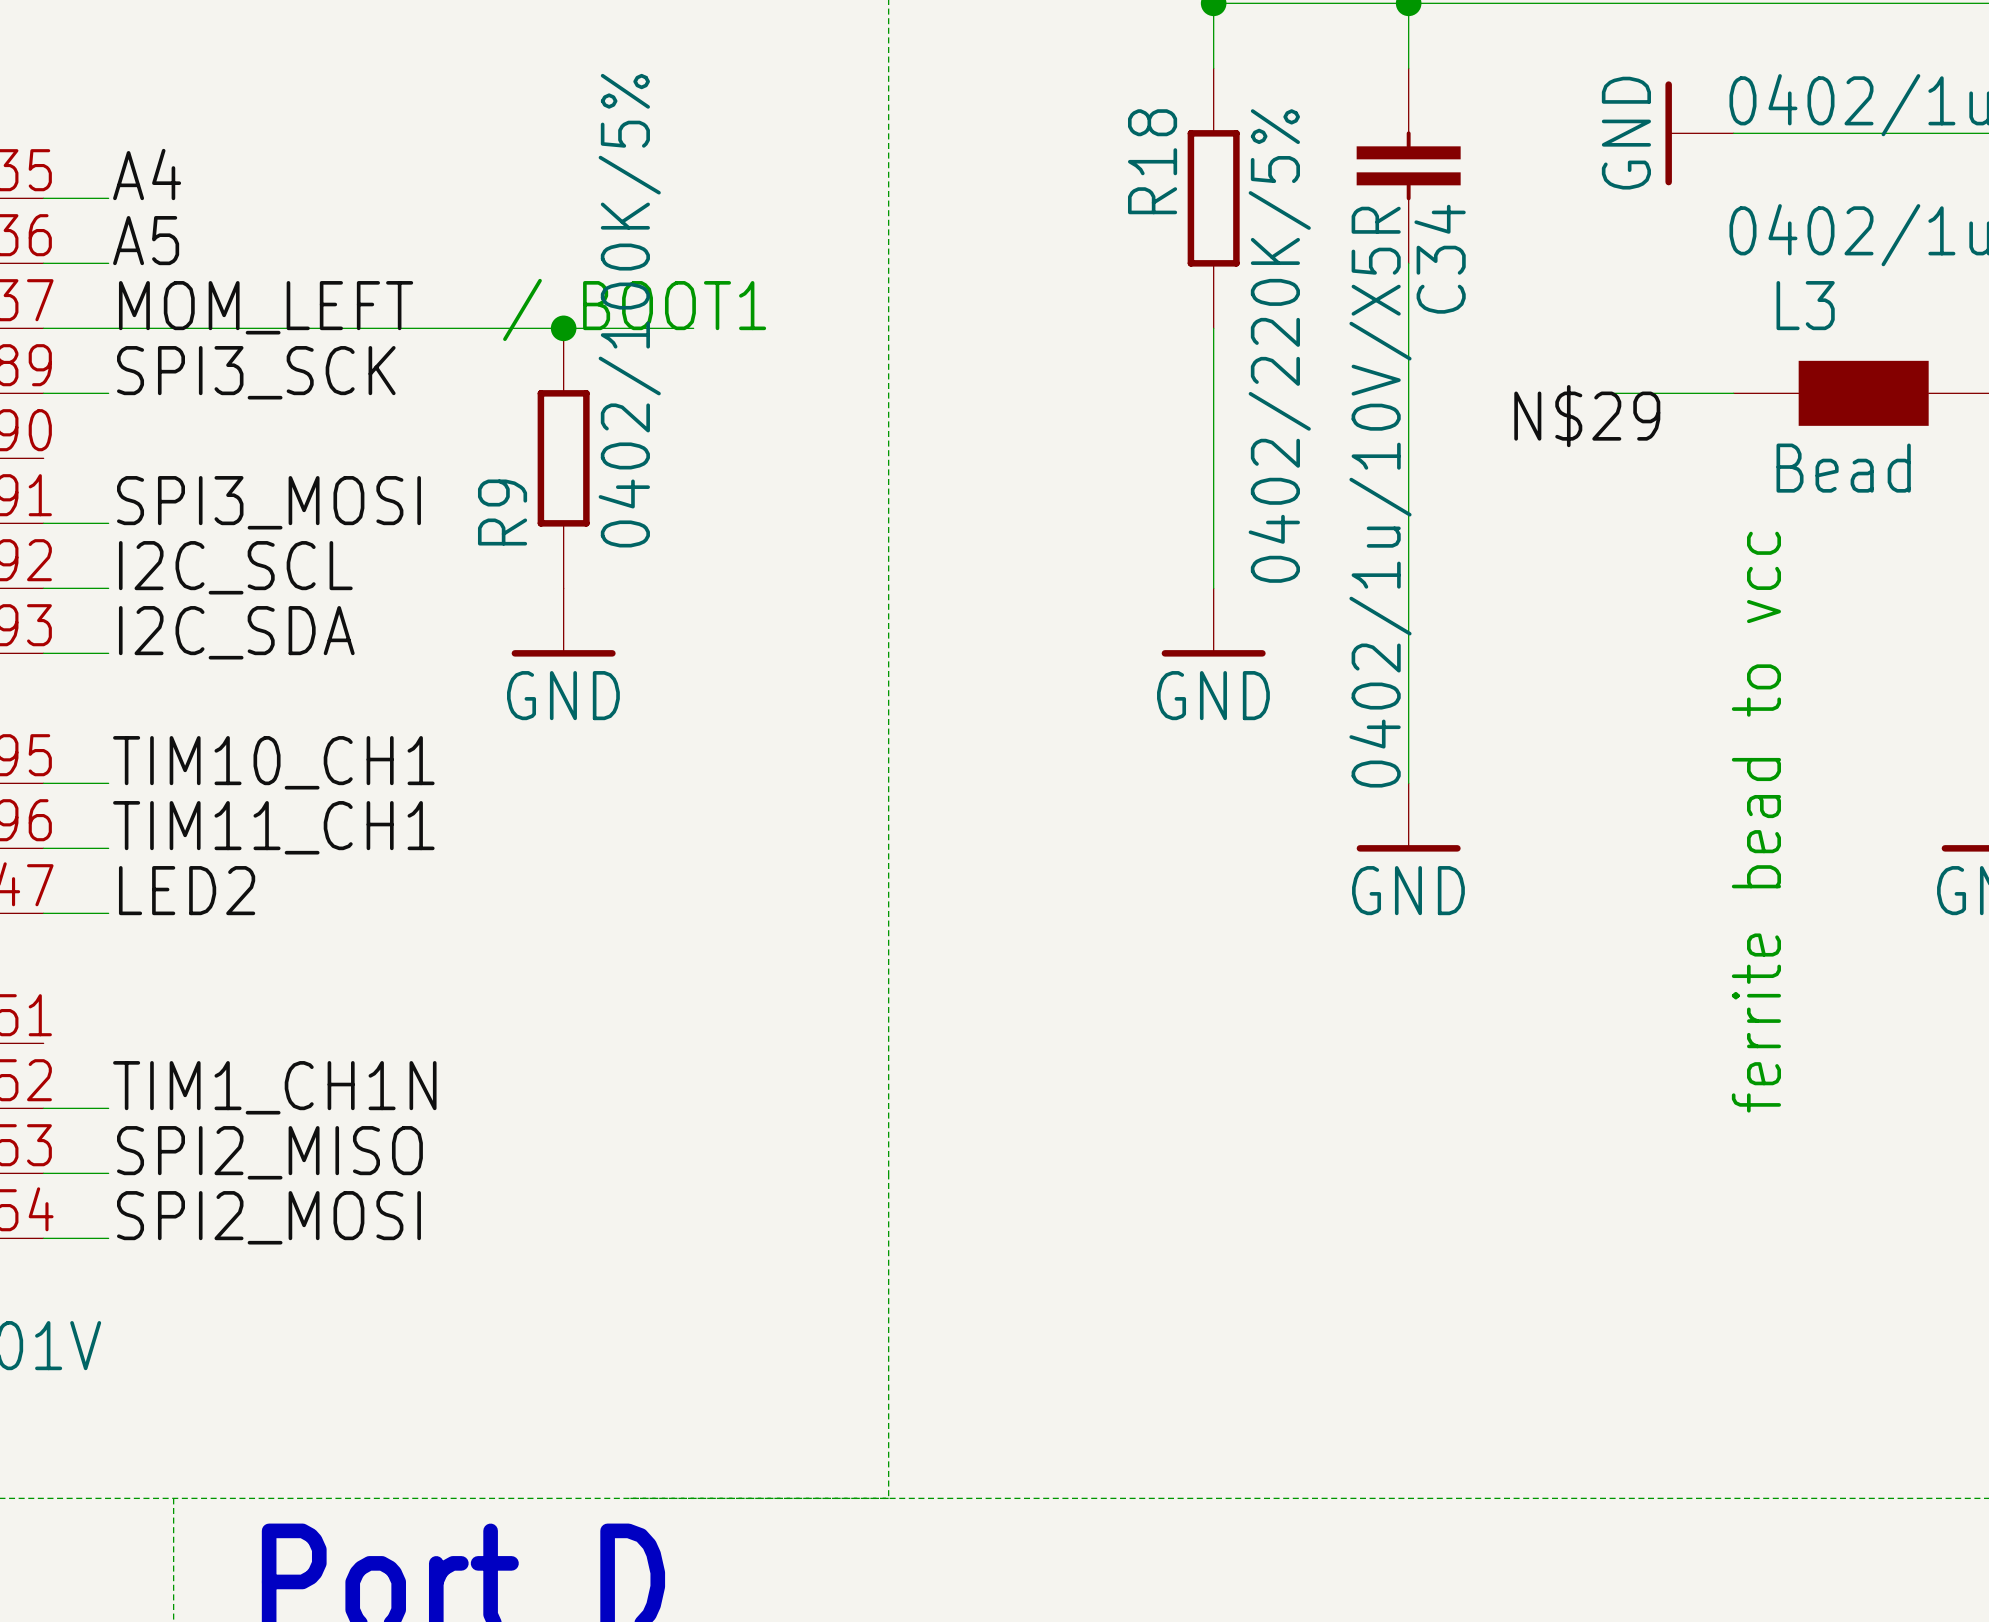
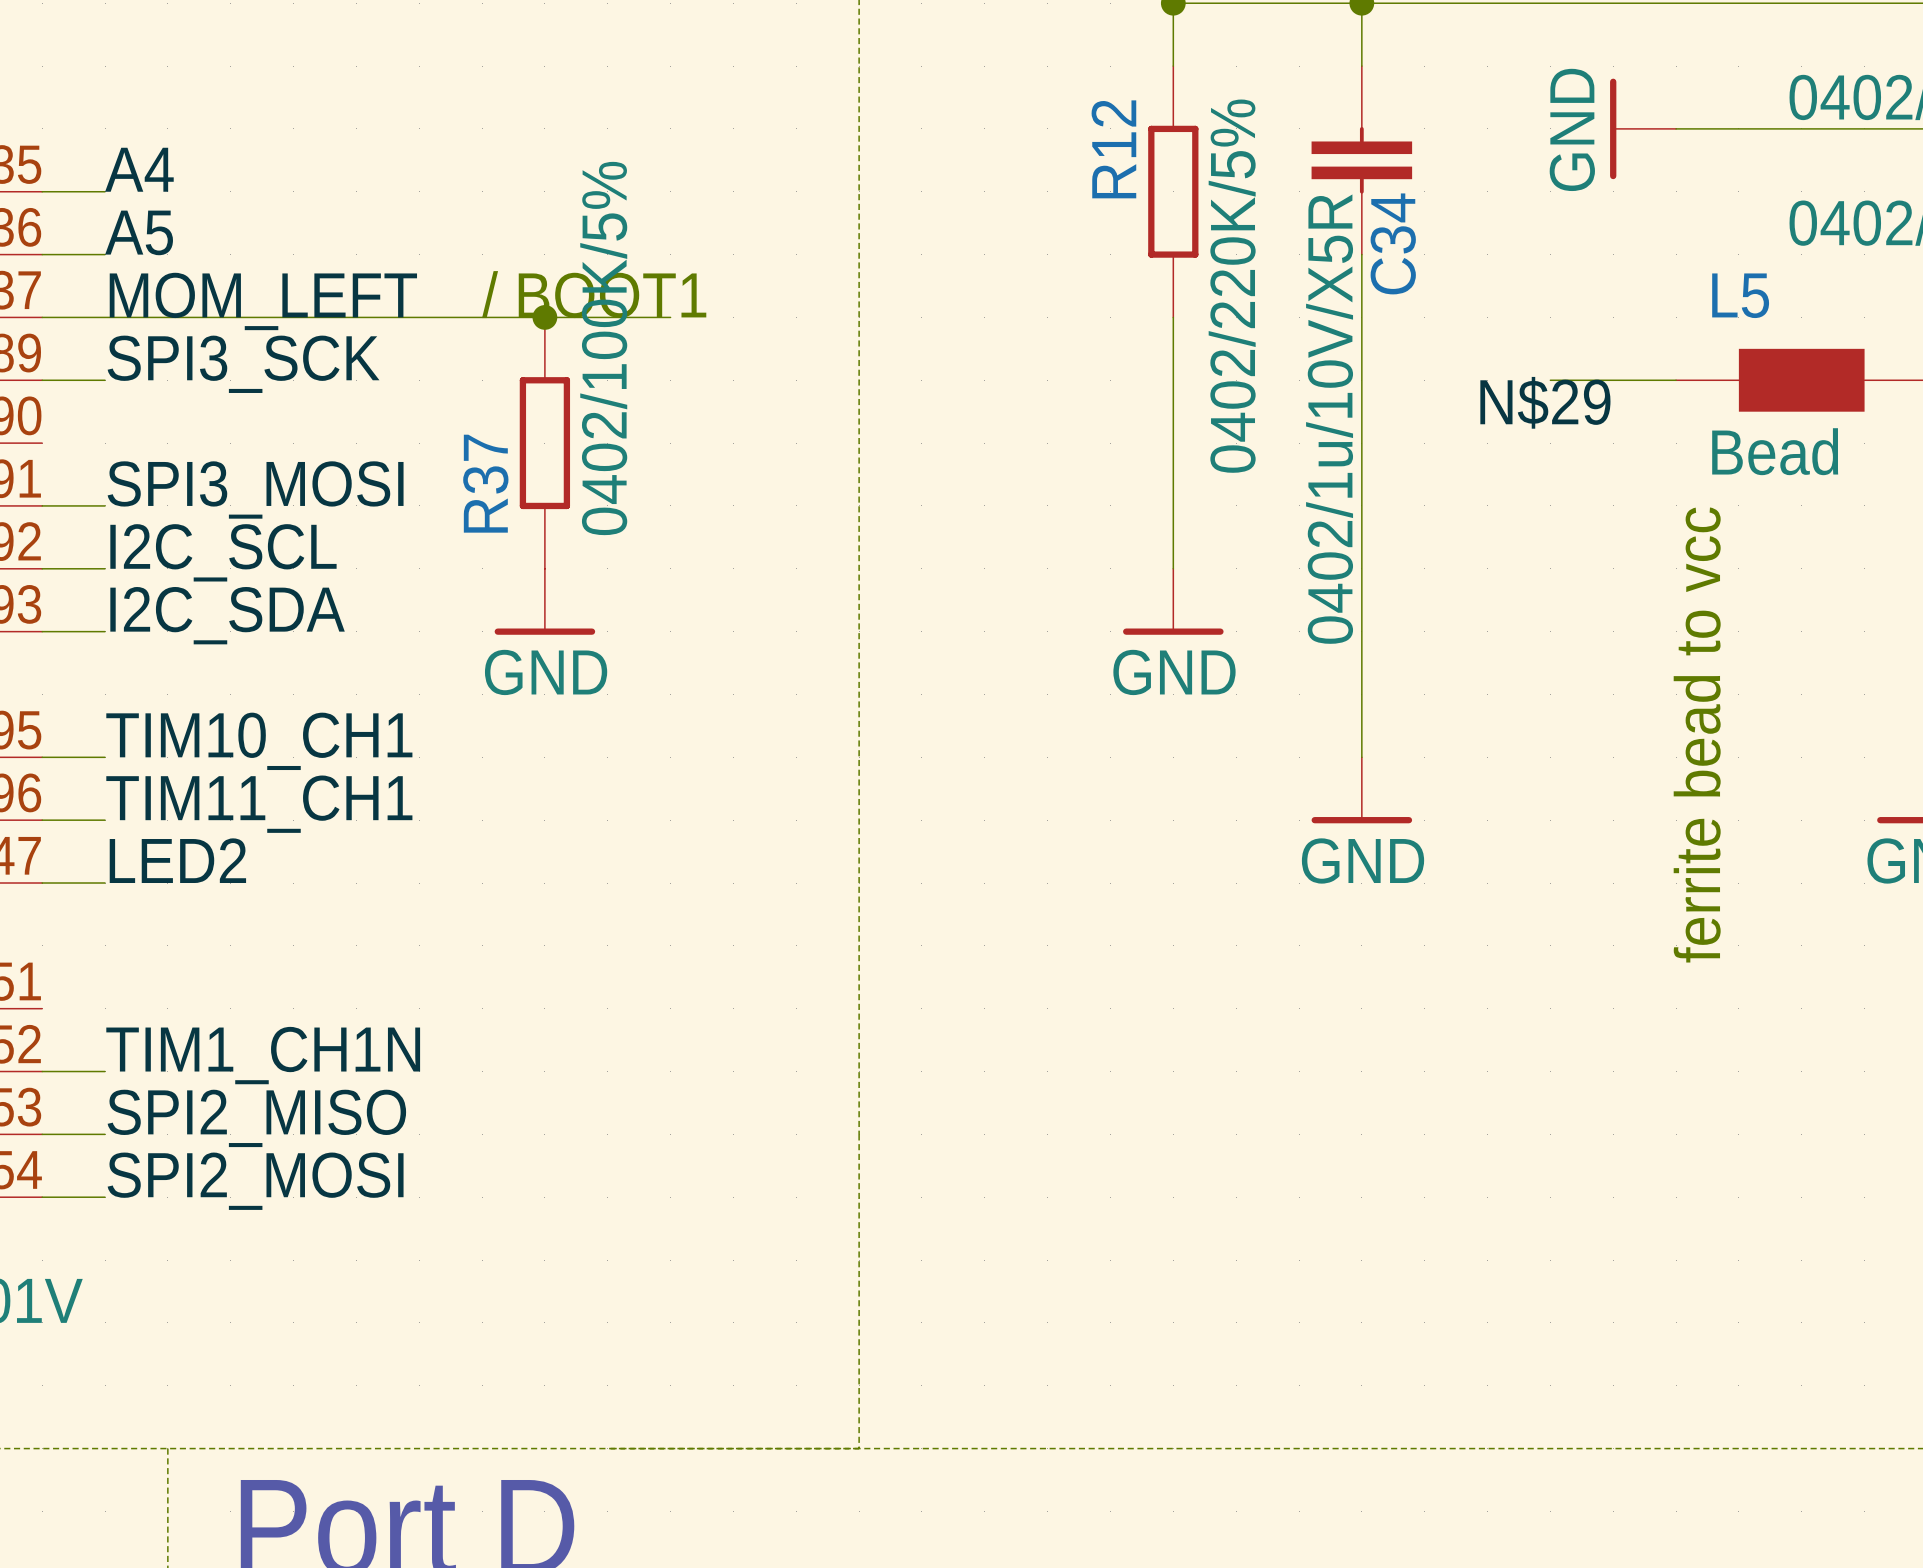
R18 name: R18 (1152, 161) -> R12 (1113, 149)
L3 name: L3 (1805, 305) -> L5 (1740, 295)
R9 name: R9 (502, 512) -> R37 (485, 483)

